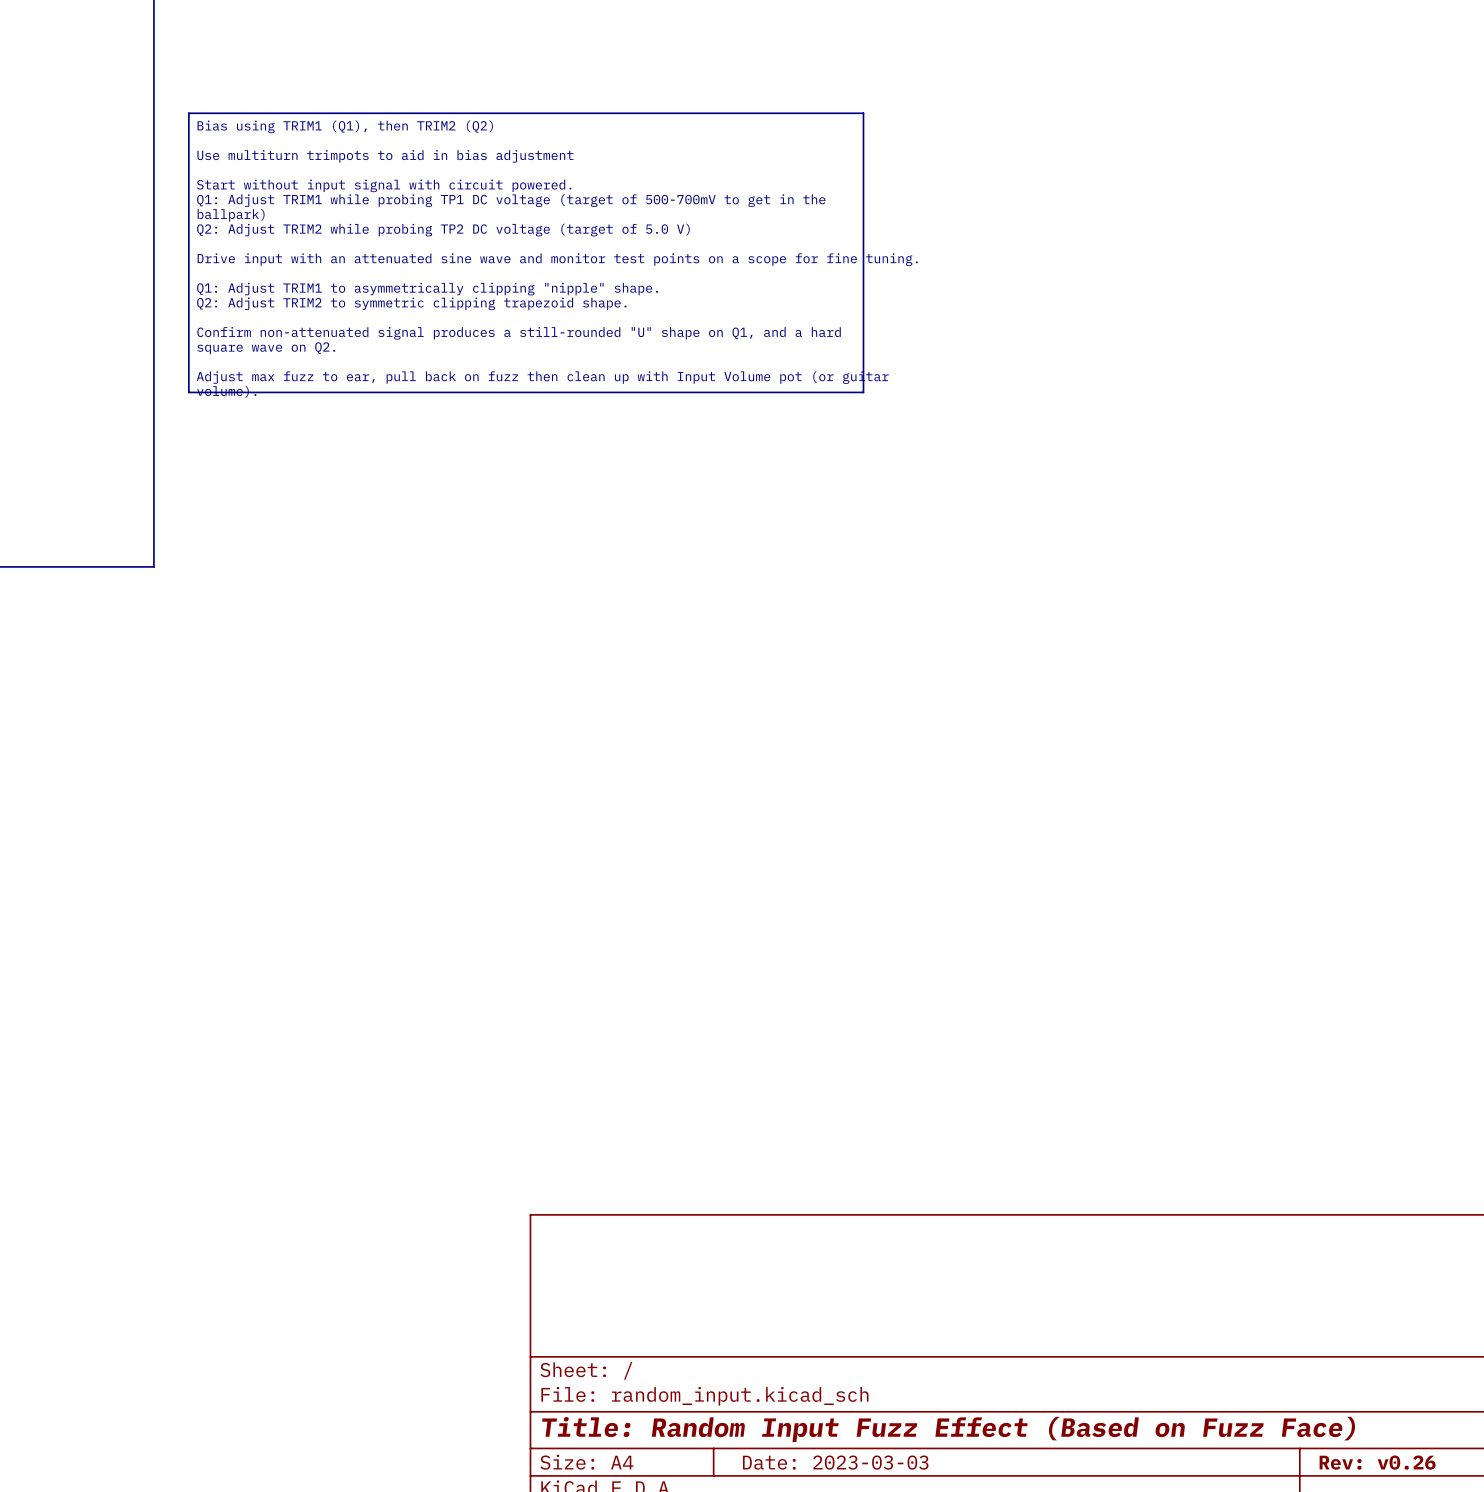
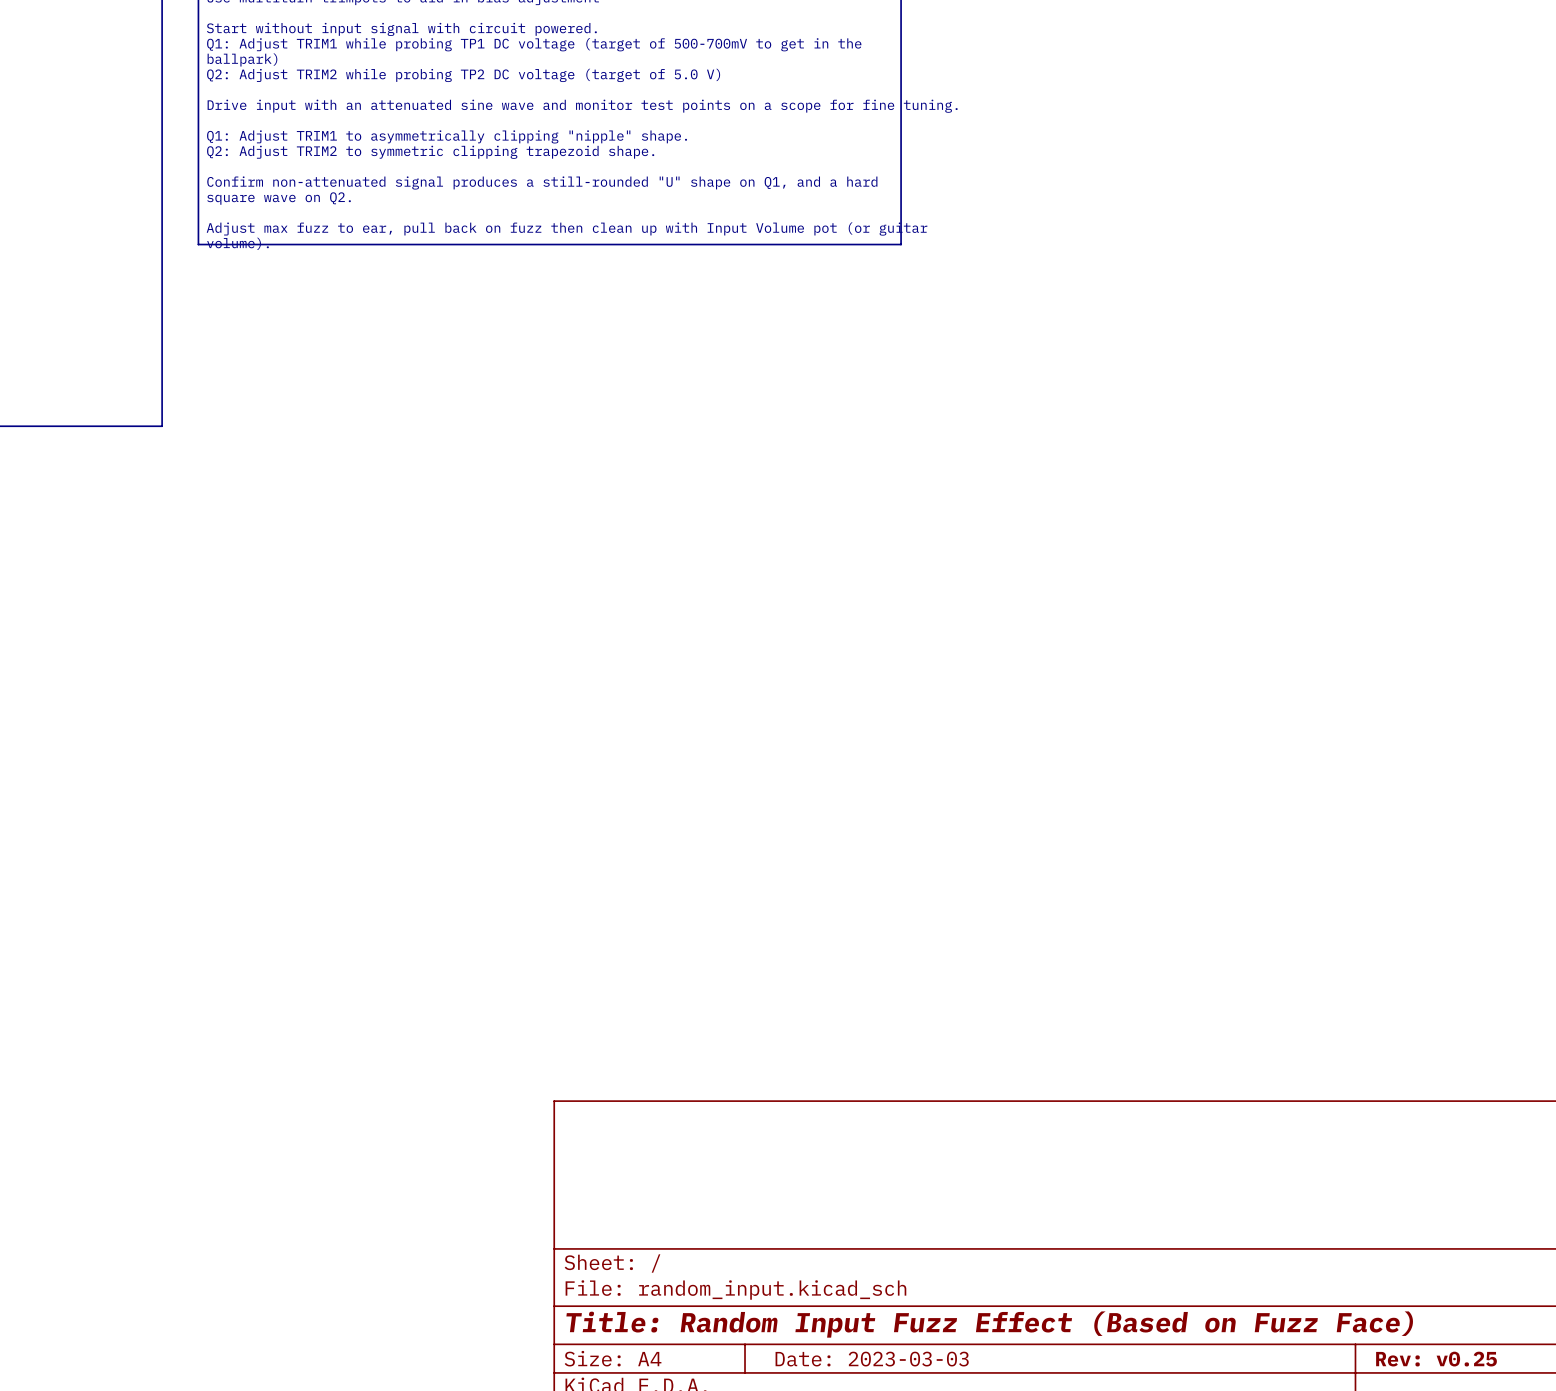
title block: Rev: v0.26 (1377, 1462) -> Rev: v0.25 (1436, 1359)

